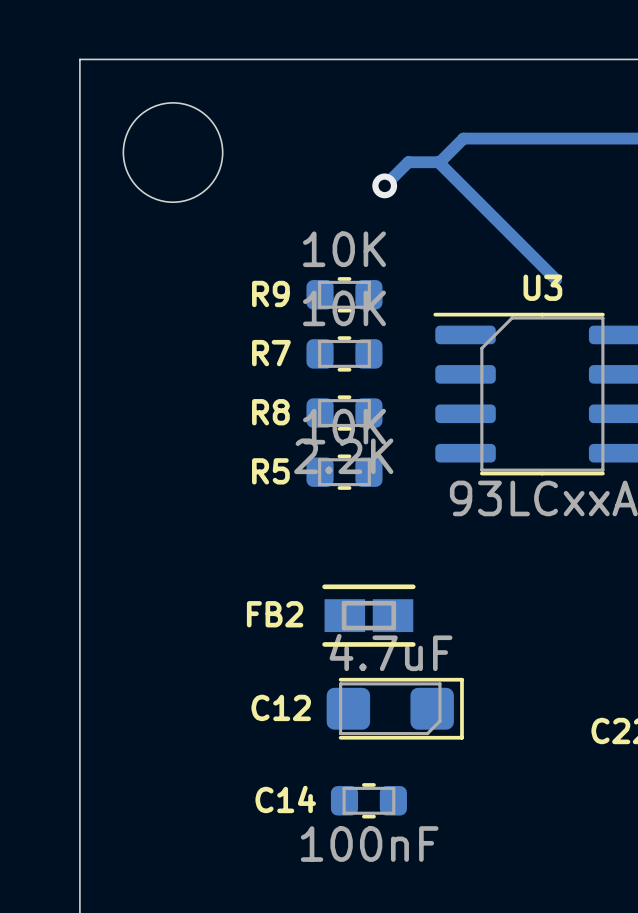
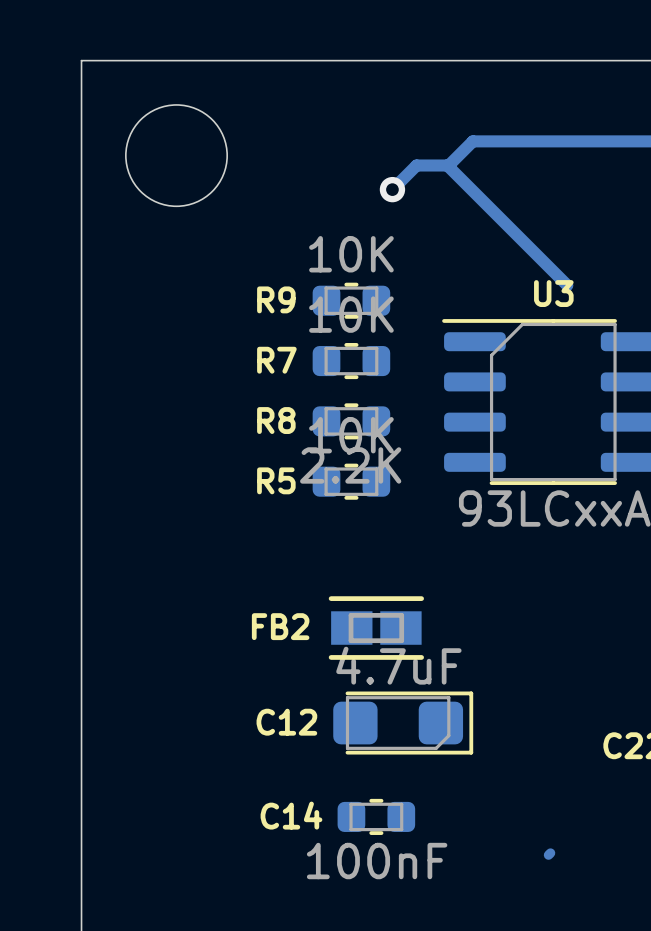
track: none -> (550, 853) (548, 855)

